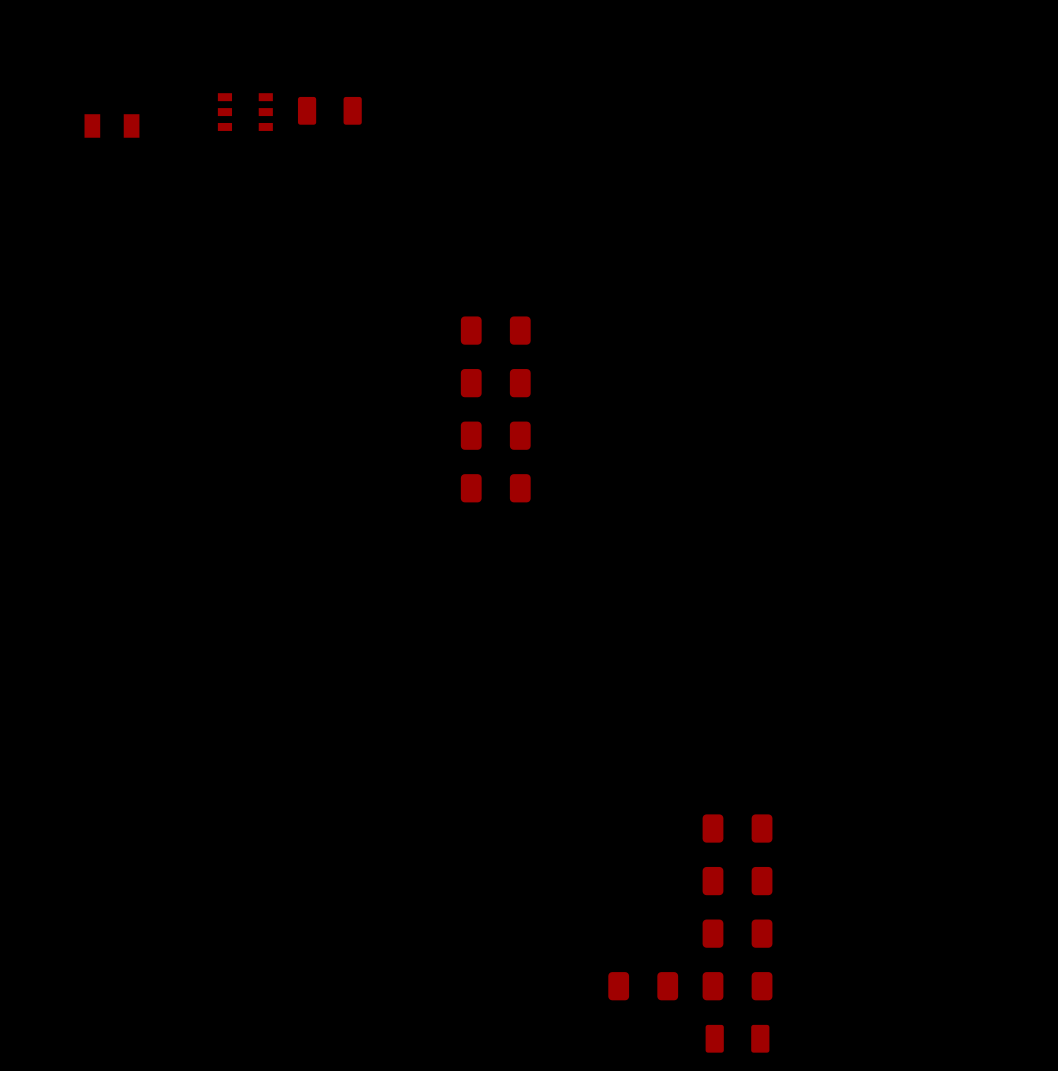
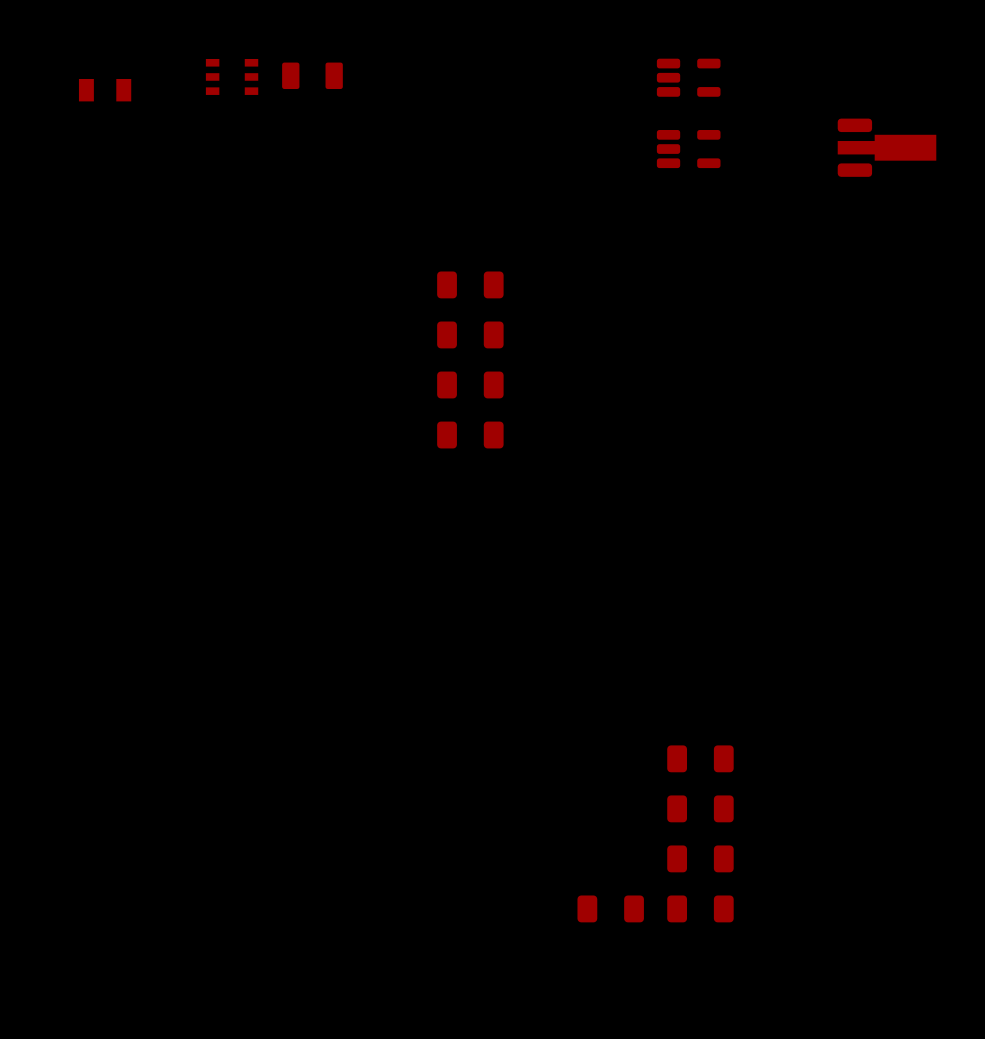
part: none -> (688, 77)
part: none -> (887, 147)
part: none -> (688, 149)
part: (737, 1038) -> none

